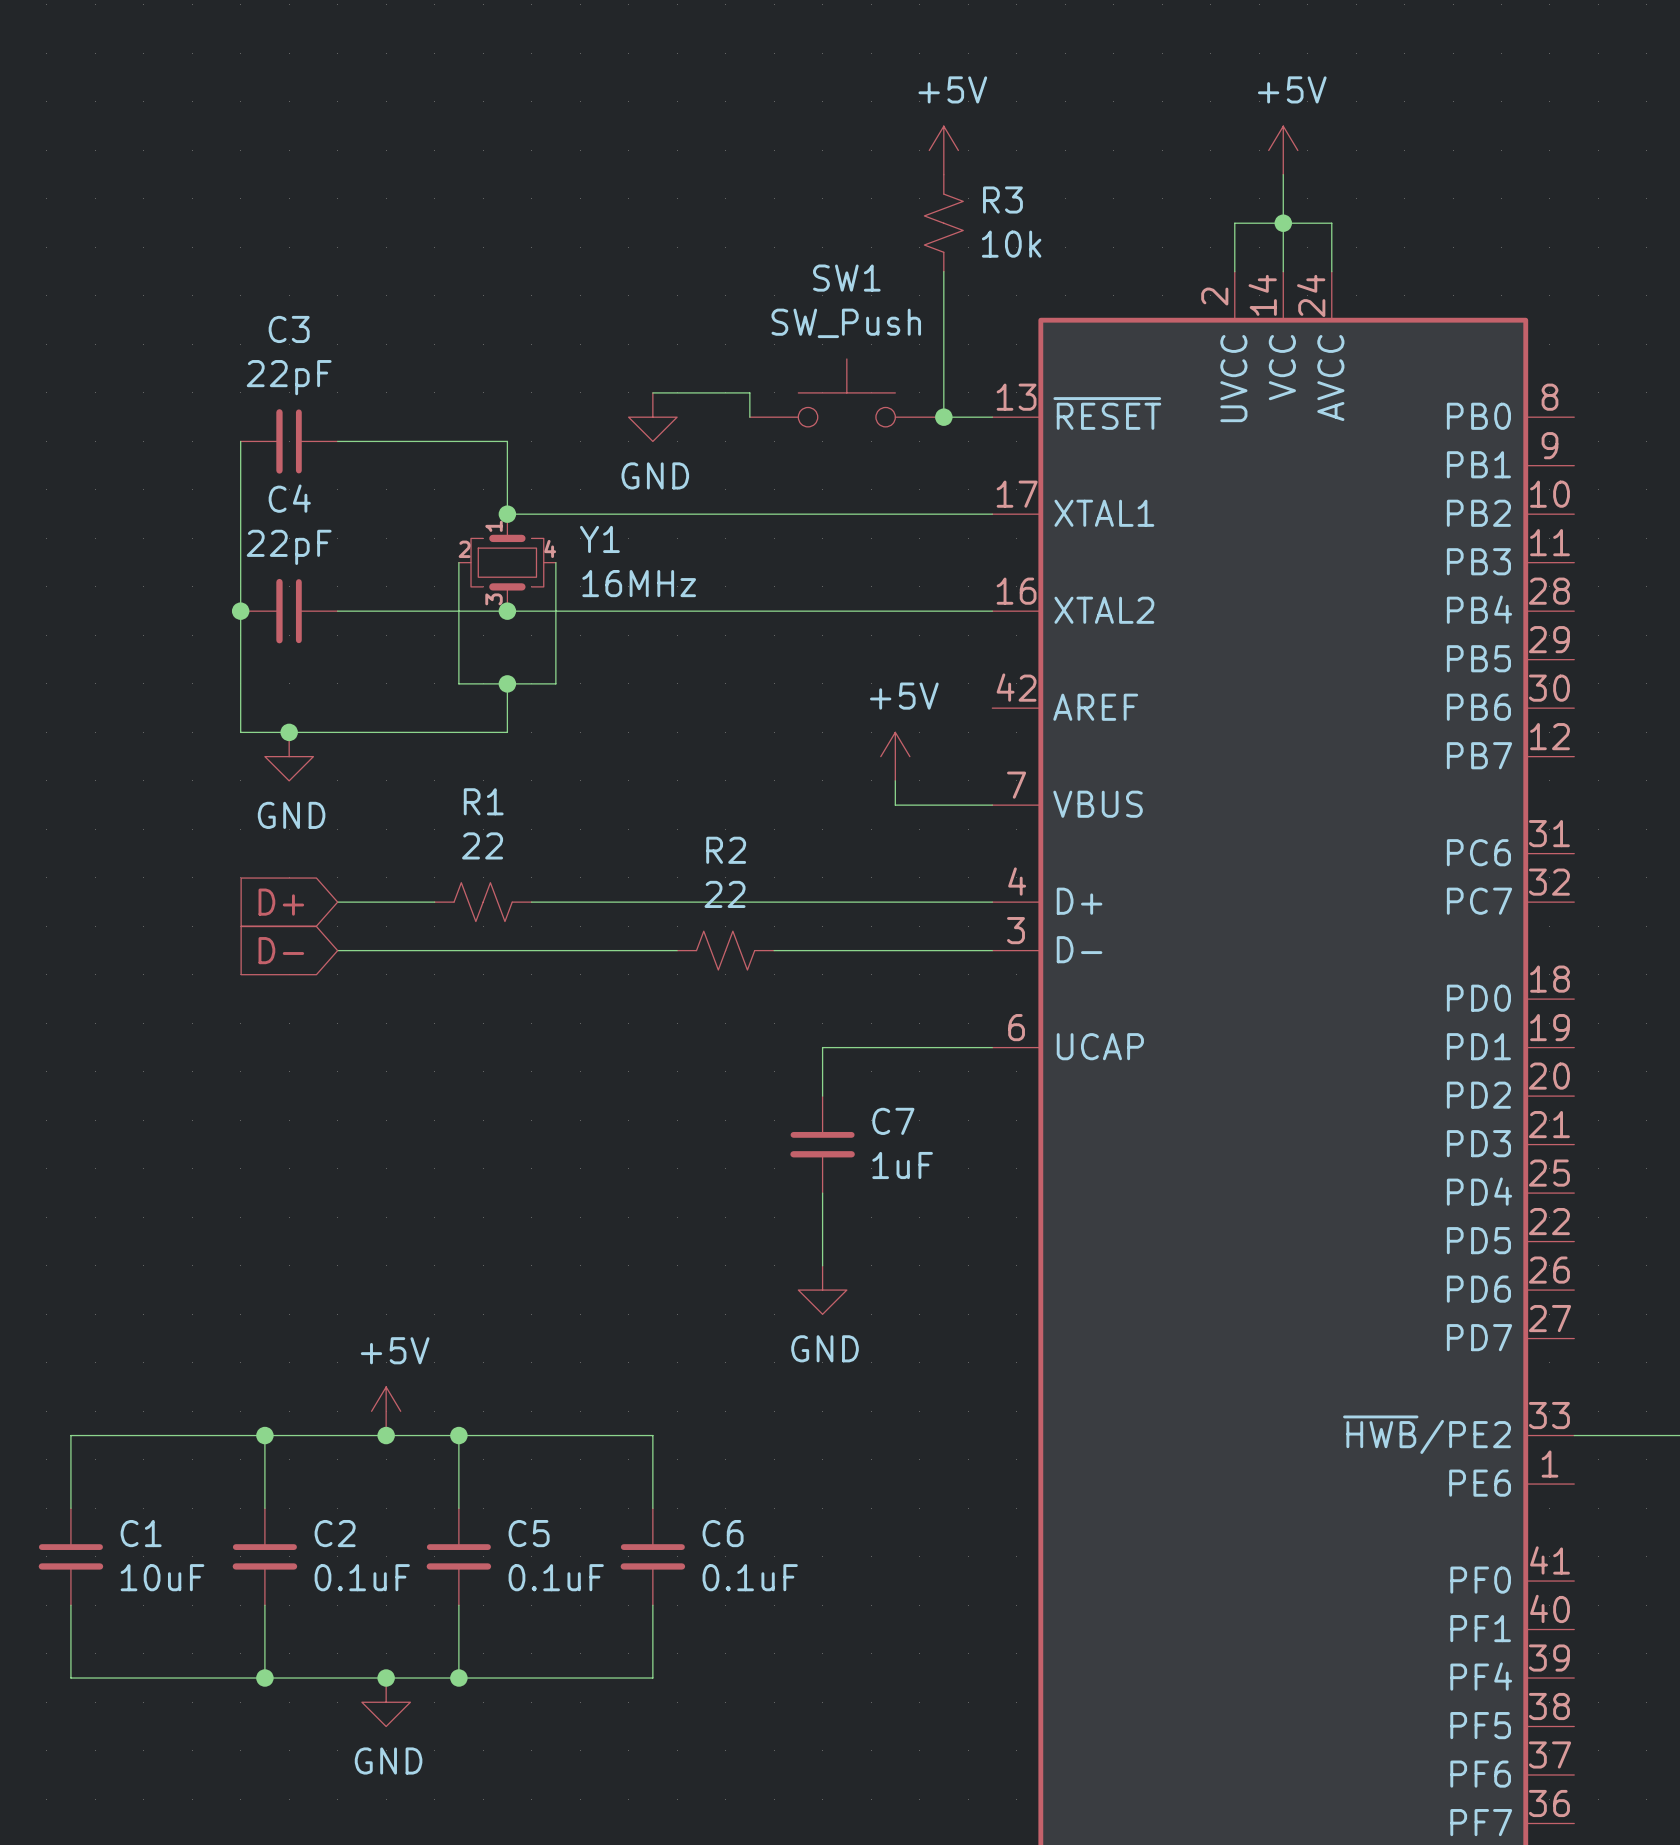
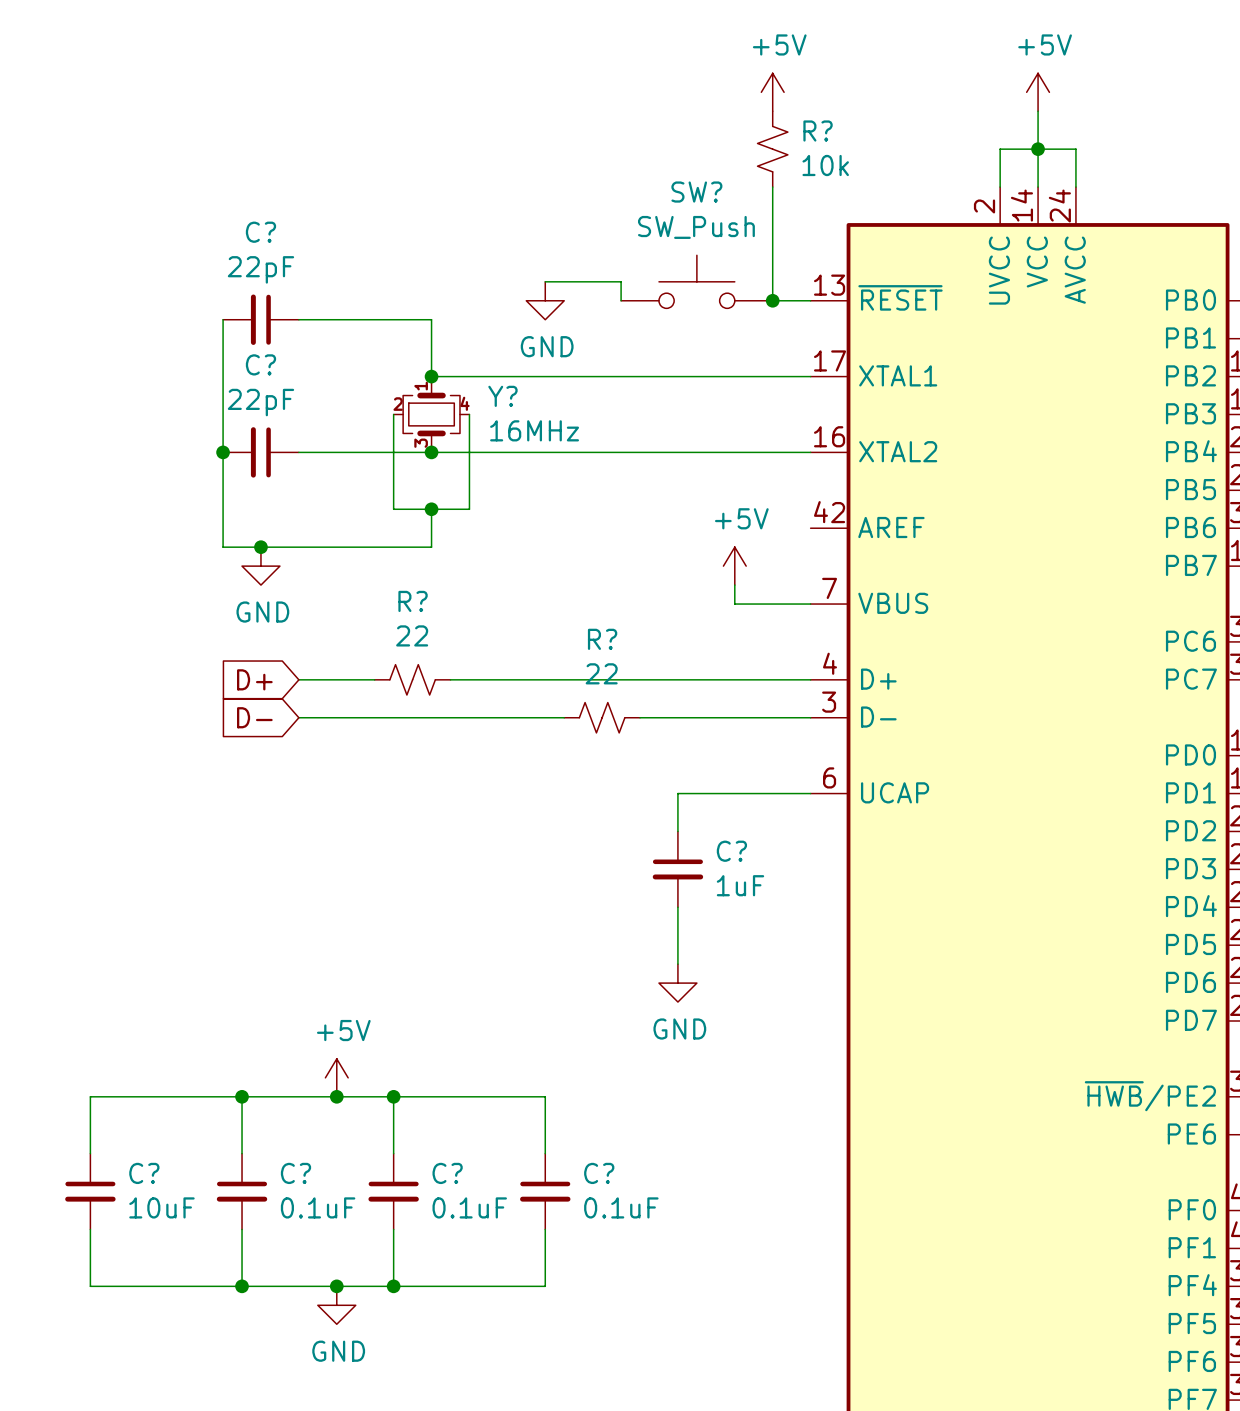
R3 name: R3 (1002, 199) -> R? (818, 131)
SW1 name: SW1 (846, 278) -> SW? (696, 192)
C3 name: C3 (289, 329) -> C? (260, 232)
C4 name: C4 (289, 498) -> C? (260, 364)
Y1 name: Y1 (599, 539) -> Y? (502, 396)
R1 name: R1 (483, 801) -> R? (413, 601)
R2 name: R2 (726, 850) -> R? (602, 639)
C7 name: C7 (893, 1121) -> C? (731, 851)
C1 name: C1 (141, 1533) -> C? (144, 1173)
C2 name: C2 (335, 1533) -> C? (295, 1173)
C5 name: C5 (529, 1533) -> C? (447, 1173)
C6 name: C6 (723, 1533) -> C? (599, 1173)

